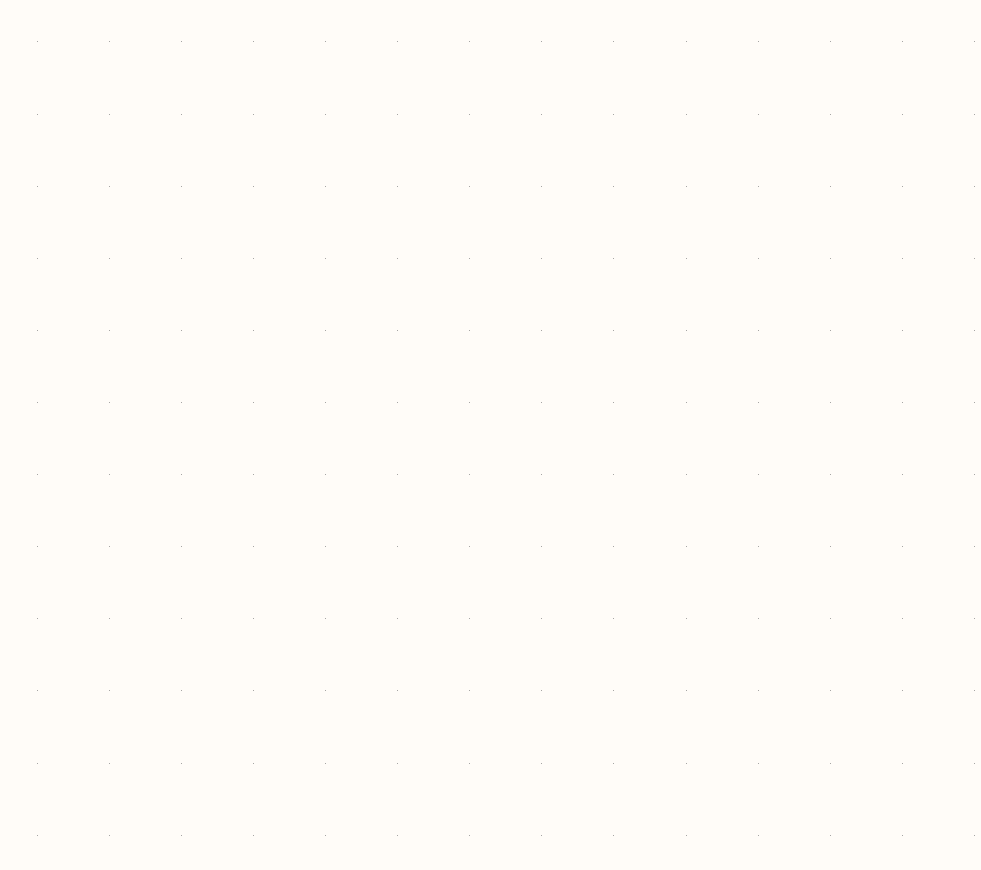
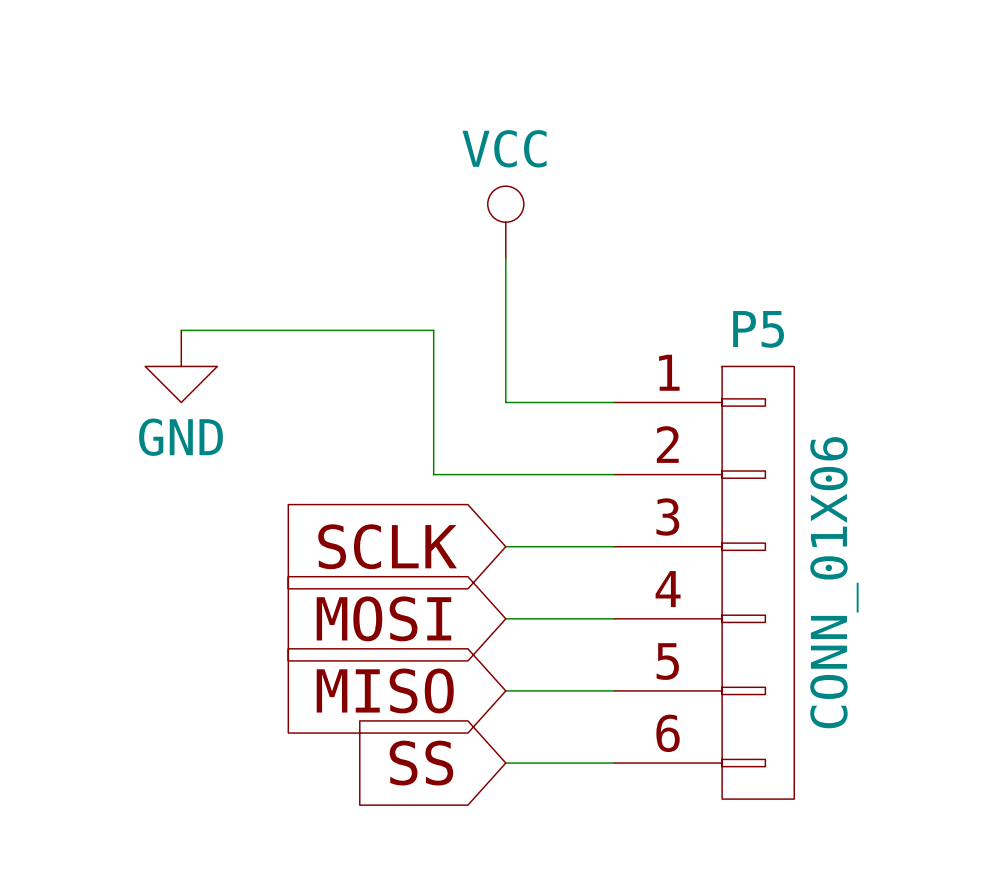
power symbol: none -> VCC (505, 222)
wire: none -> (505, 258) (505, 402) (613, 402)
wire: none -> (181, 330) (433, 330) (433, 474) (613, 474)
power symbol: none -> GND (181, 366)
global label: none -> SCLK (387, 546)
wire: none -> (505, 546) (613, 546)
P5: none -> CONN_01X06 (704, 582)
global label: none -> MOSI (383, 618)
wire: none -> (505, 618) (613, 618)
global label: none -> MISO (385, 690)
wire: none -> (505, 690) (613, 690)
global label: none -> SS (421, 763)
wire: none -> (505, 763) (613, 763)

